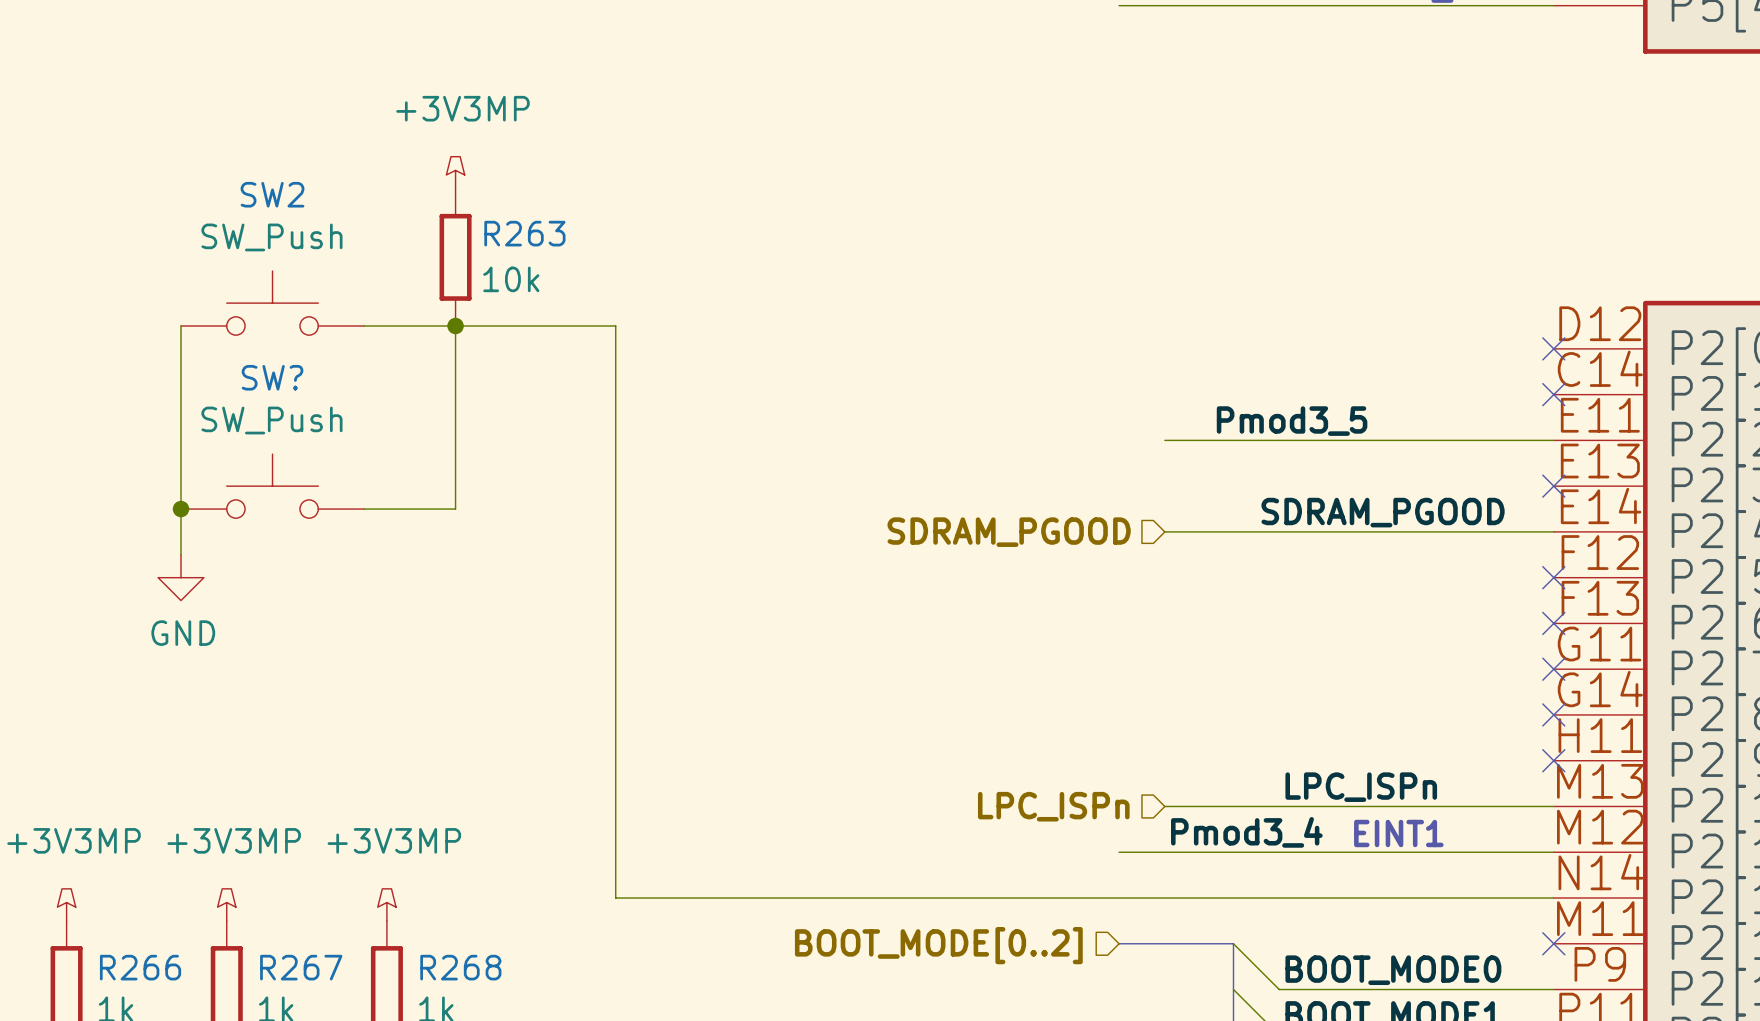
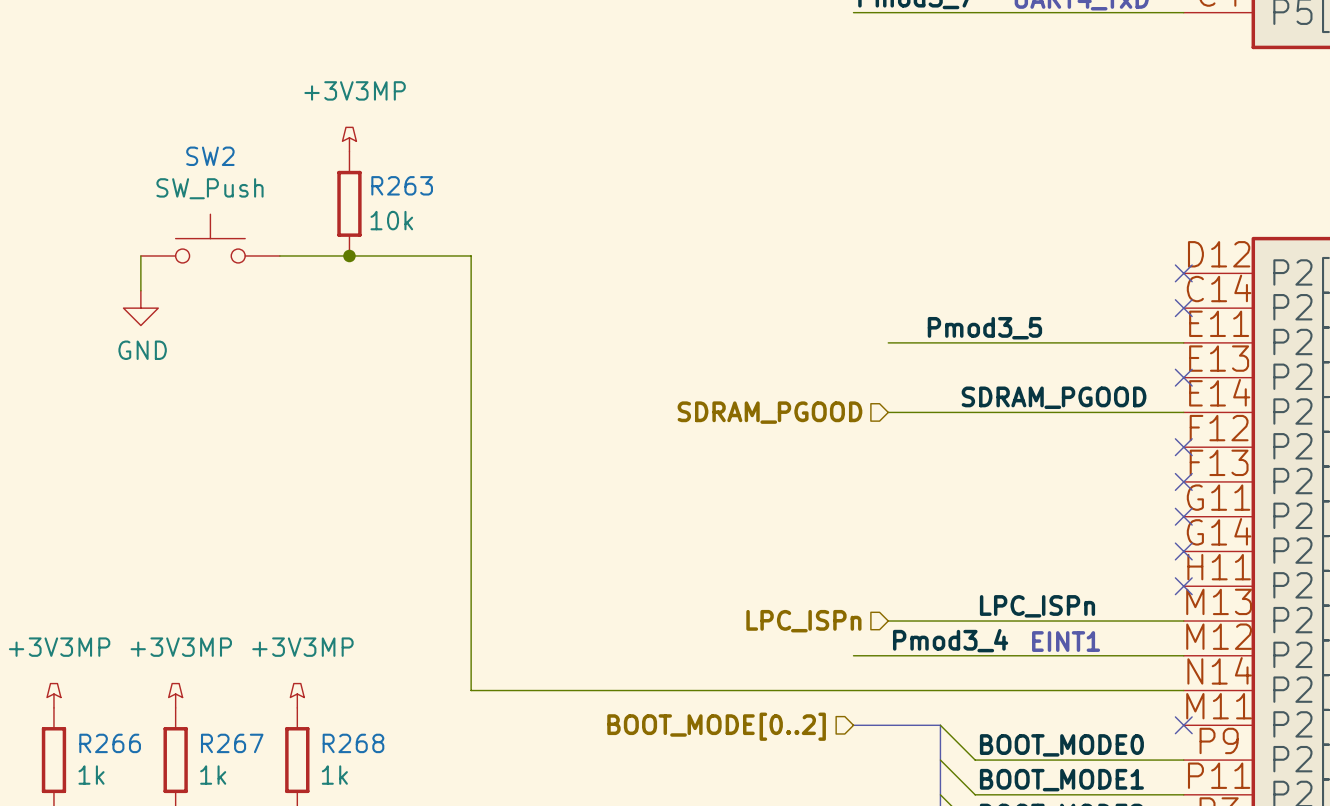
wire: (455, 325) (455, 509) (364, 509) -> none
wire: (180, 371) (180, 554) -> none
SW?: SW_Push (272, 486) -> none
junction: (180, 509) -> none
power symbol position: GND (180, 577) -> GND (140, 308)

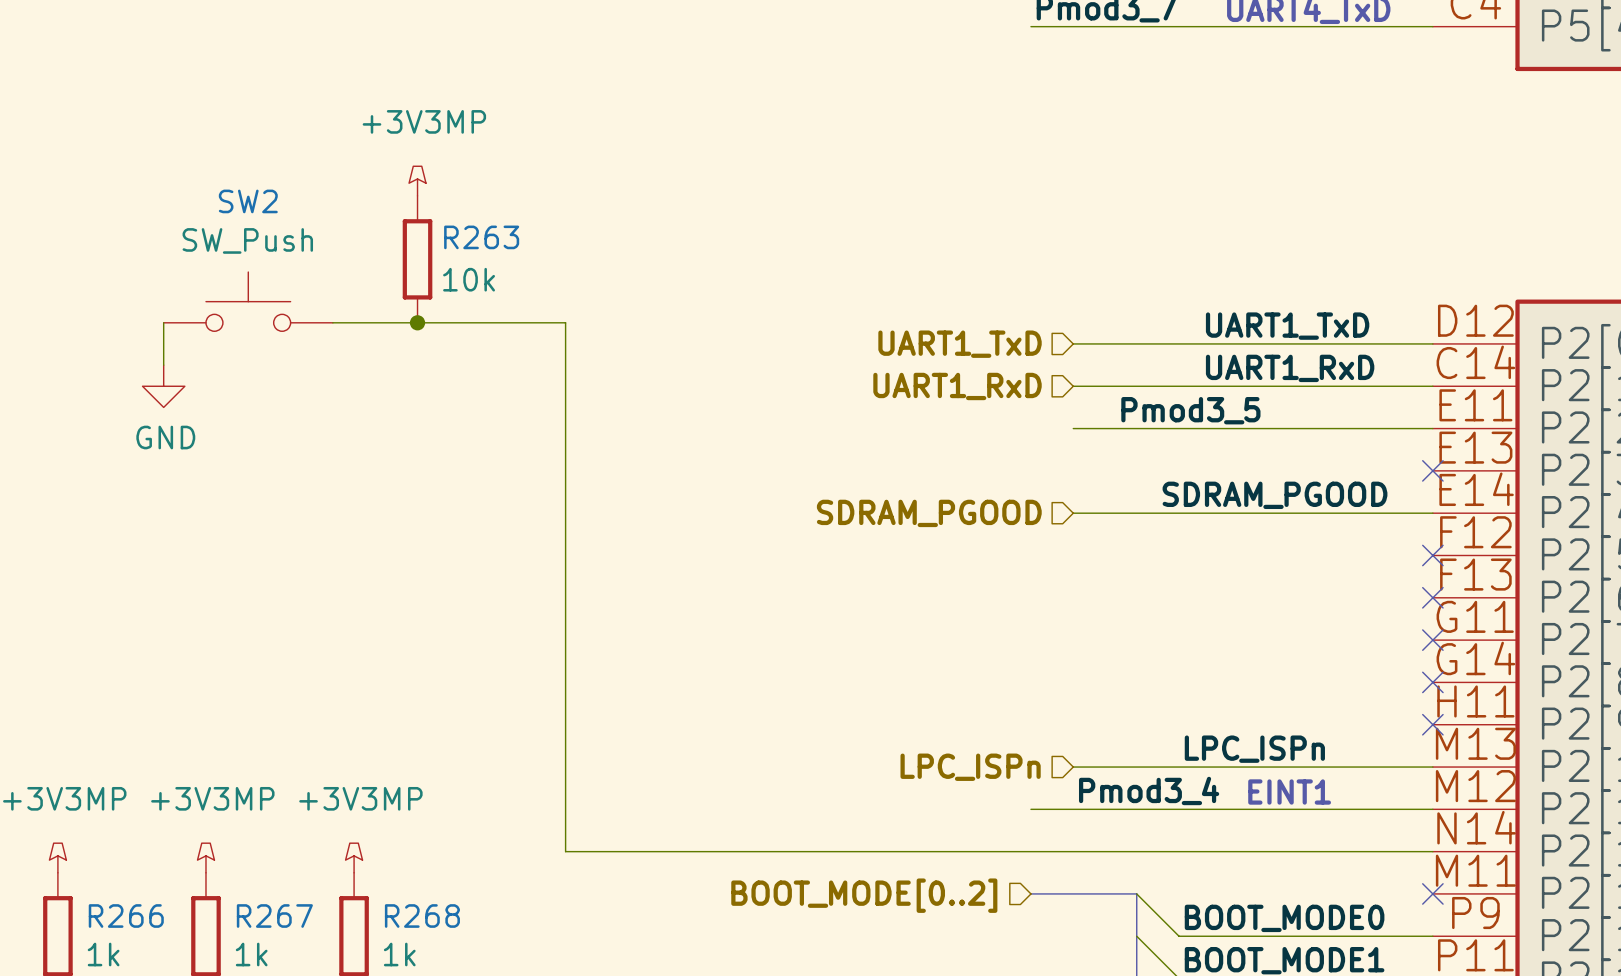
label: none -> UART1_TxD (1287, 326)
hierarchical label: none -> UART1_TxD (960, 344)
wire: none -> (1073, 343) (1432, 343)
no-connect mark: (1183, 273) -> none
label: none -> UART1_RxD (1290, 368)
hierarchical label: none -> UART1_RxD (957, 386)
wire: none -> (1073, 386) (1432, 386)
no-connect mark: (1183, 308) -> none

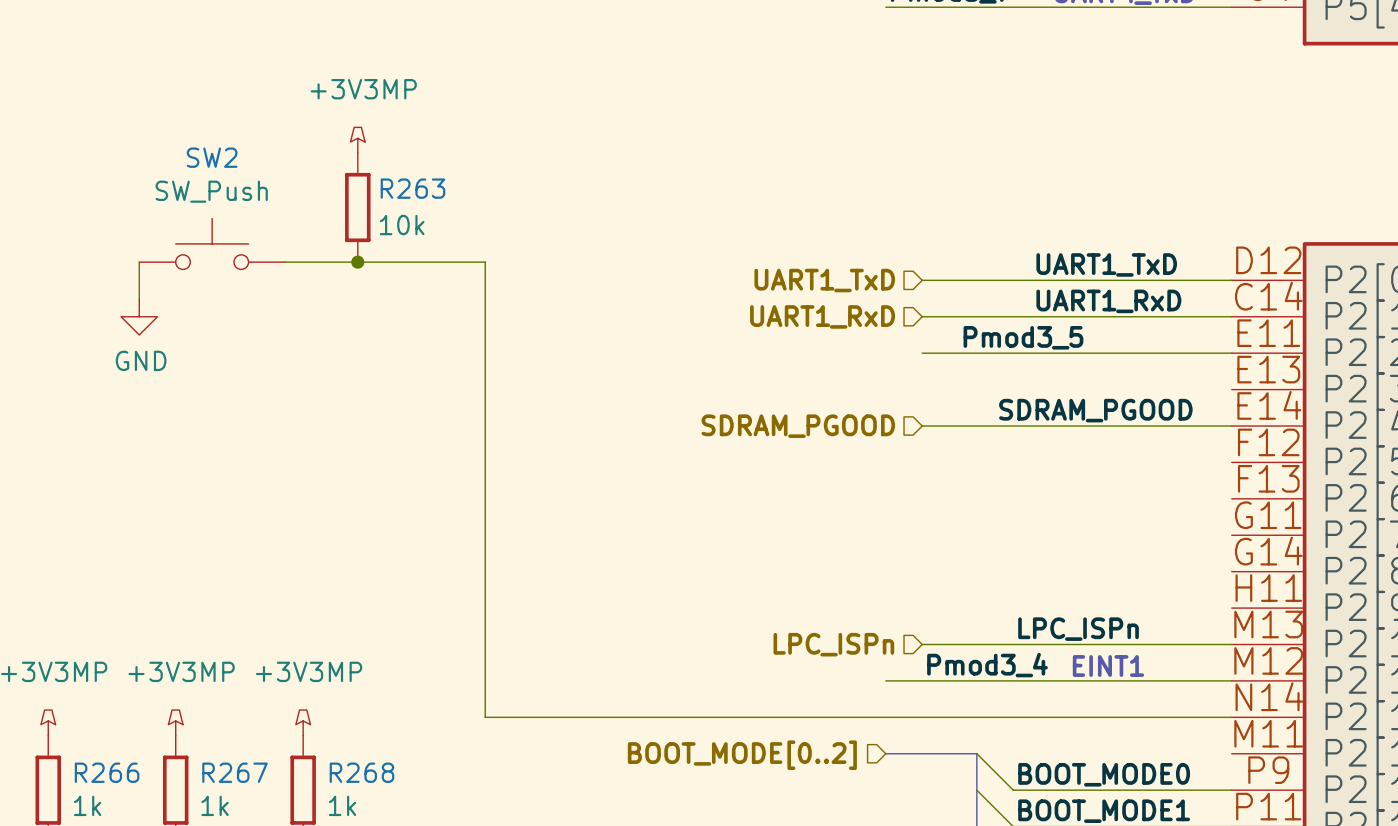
no-connect mark: (1432, 470) -> none
no-connect mark: (1432, 555) -> none
no-connect mark: (1432, 597) -> none
no-connect mark: (1432, 640) -> none
no-connect mark: (1432, 682) -> none
no-connect mark: (1432, 724) -> none
no-connect mark: (1432, 893) -> none

